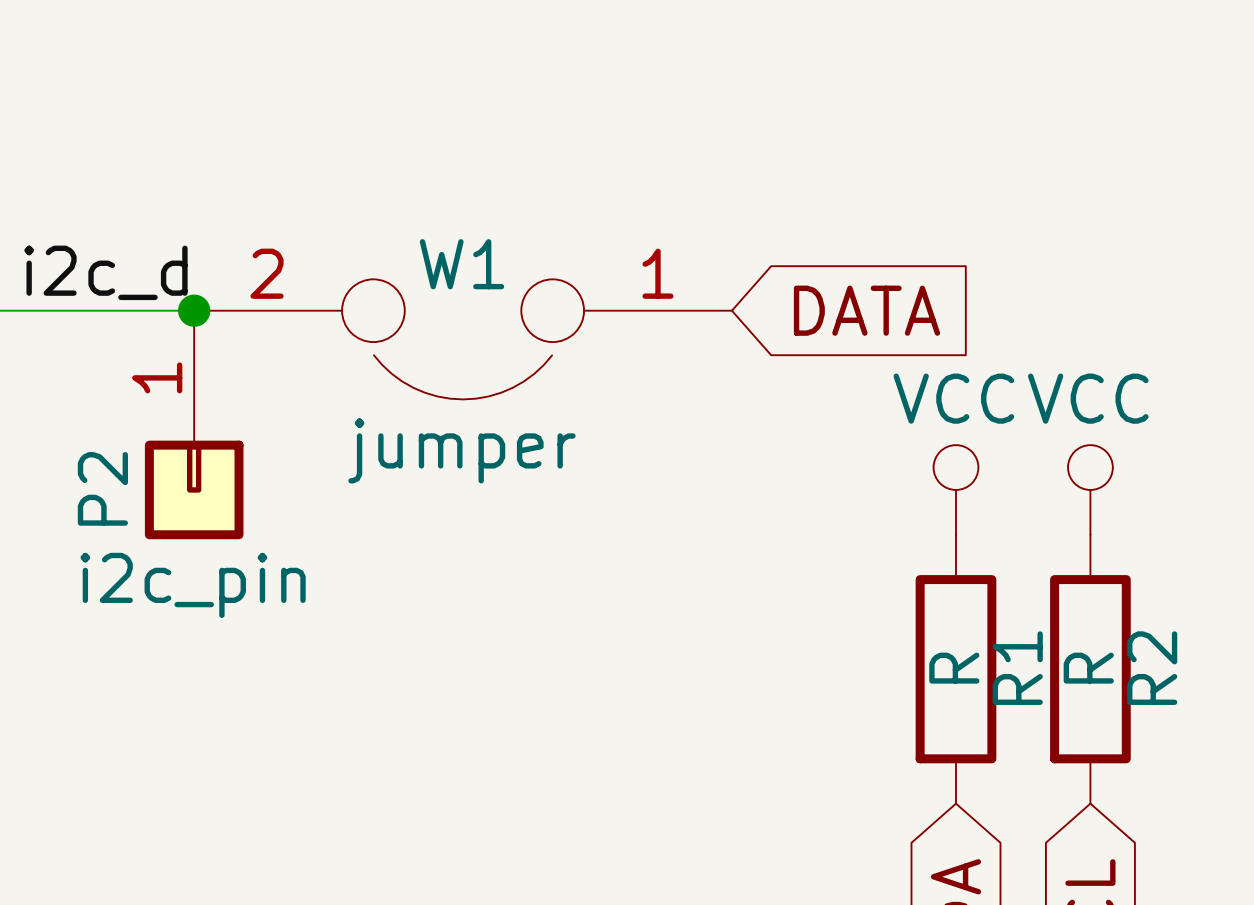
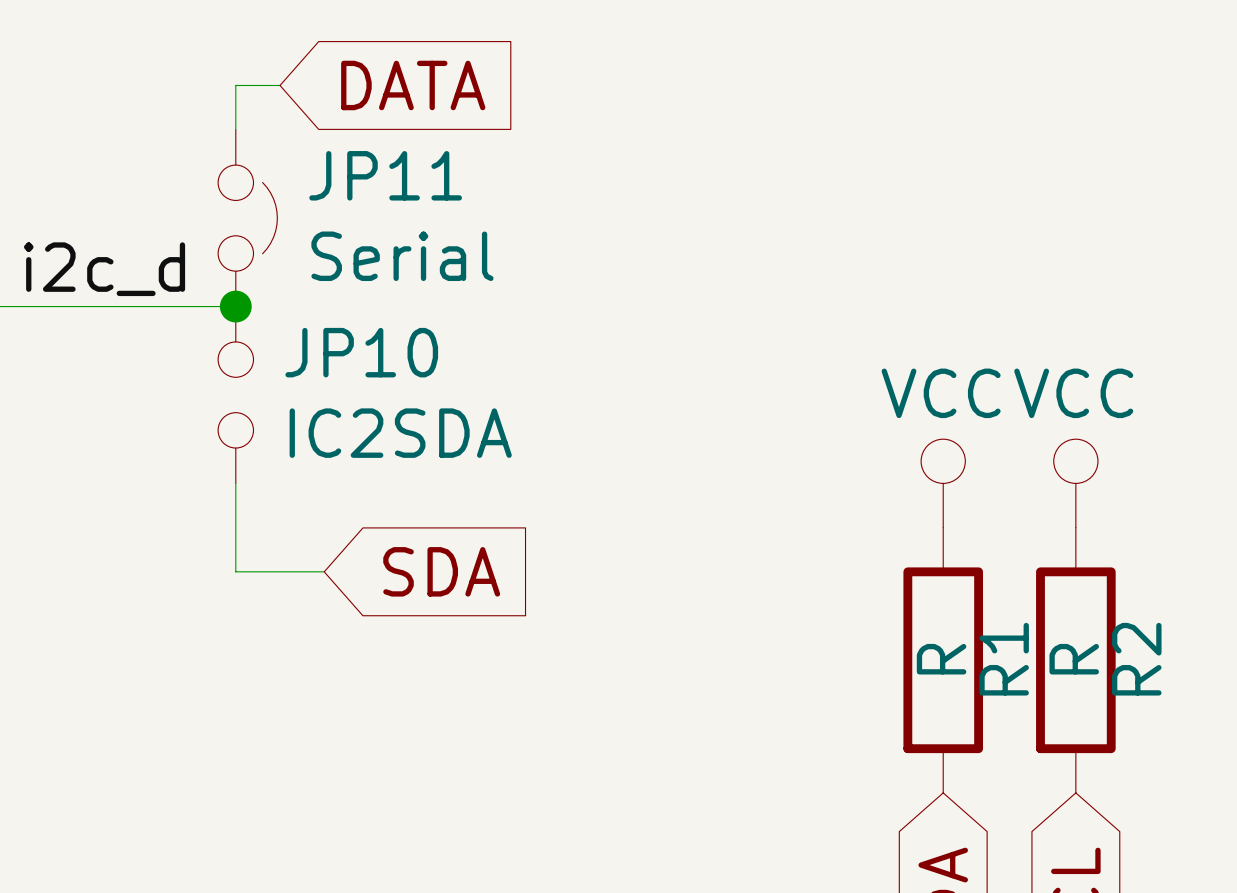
wire: none -> (280, 85) (235, 85) (235, 129)
JP11: none -> Serial (247, 218)
junction position: (194, 310) -> (235, 306)
global label position: DATA (866, 310) -> DATA (413, 85)
W1: jumper (463, 339) -> none
JP10: none -> IC2SDA (235, 394)
P2: i2c_pin (194, 424) -> none
wire: none -> (235, 483) (235, 571) (324, 571)
global label: none -> SDA (441, 571)

